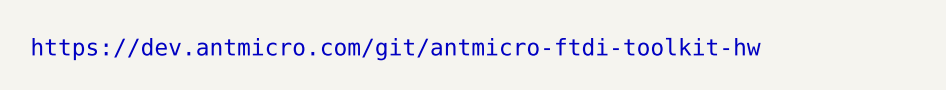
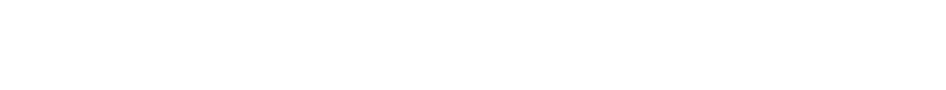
text: https://dev.antmicro.com/git/antmicro-ftdi-toolkit-hw (396, 49) -> none

